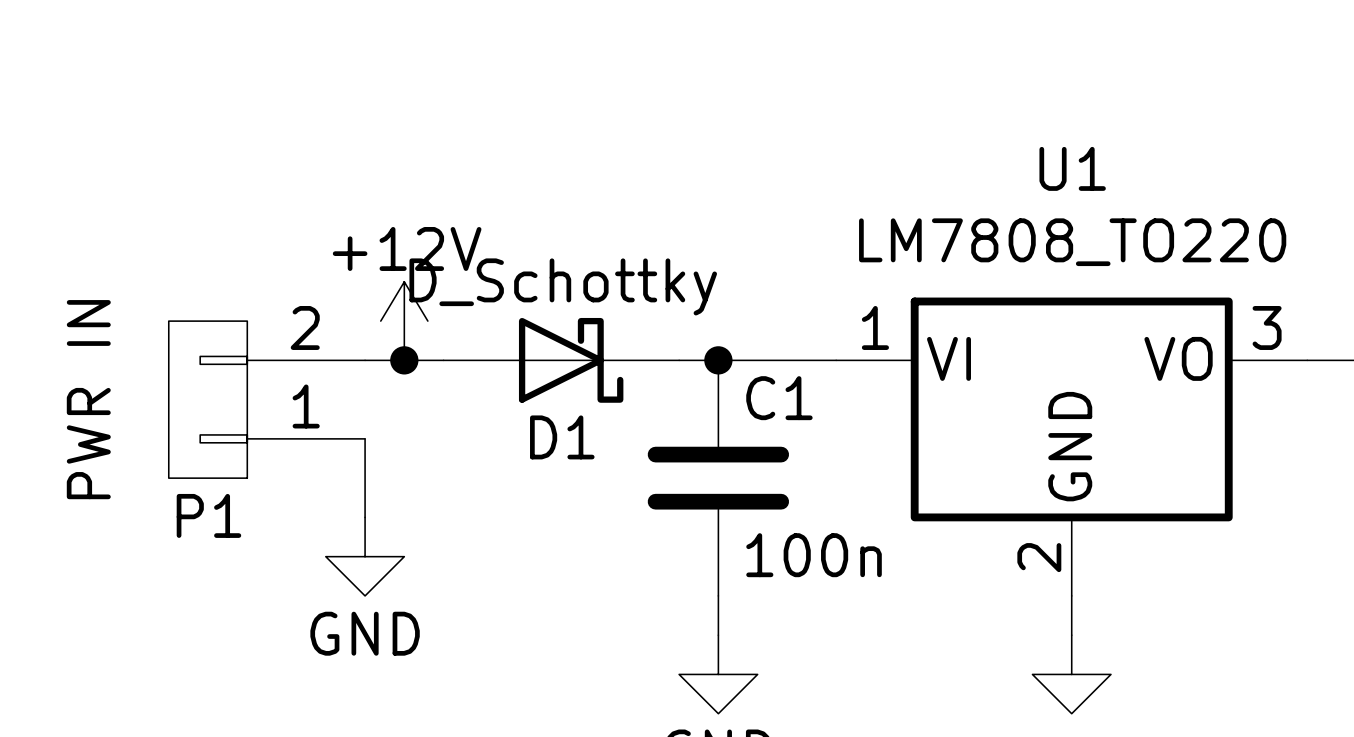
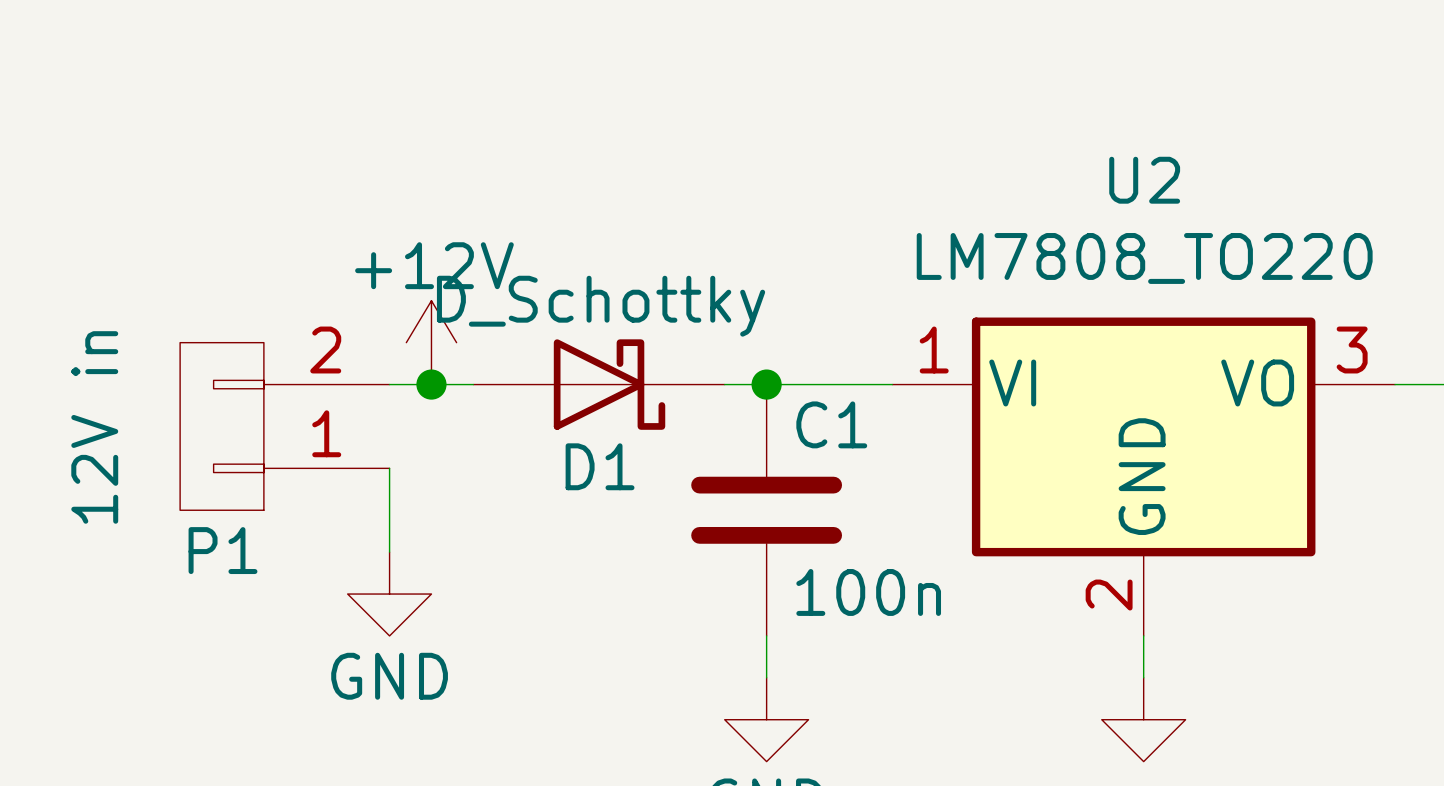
U1 name: U1 (1072, 168) -> U2 (1144, 180)
P1 value: PWR IN (88, 399) -> 12V in (94, 427)

